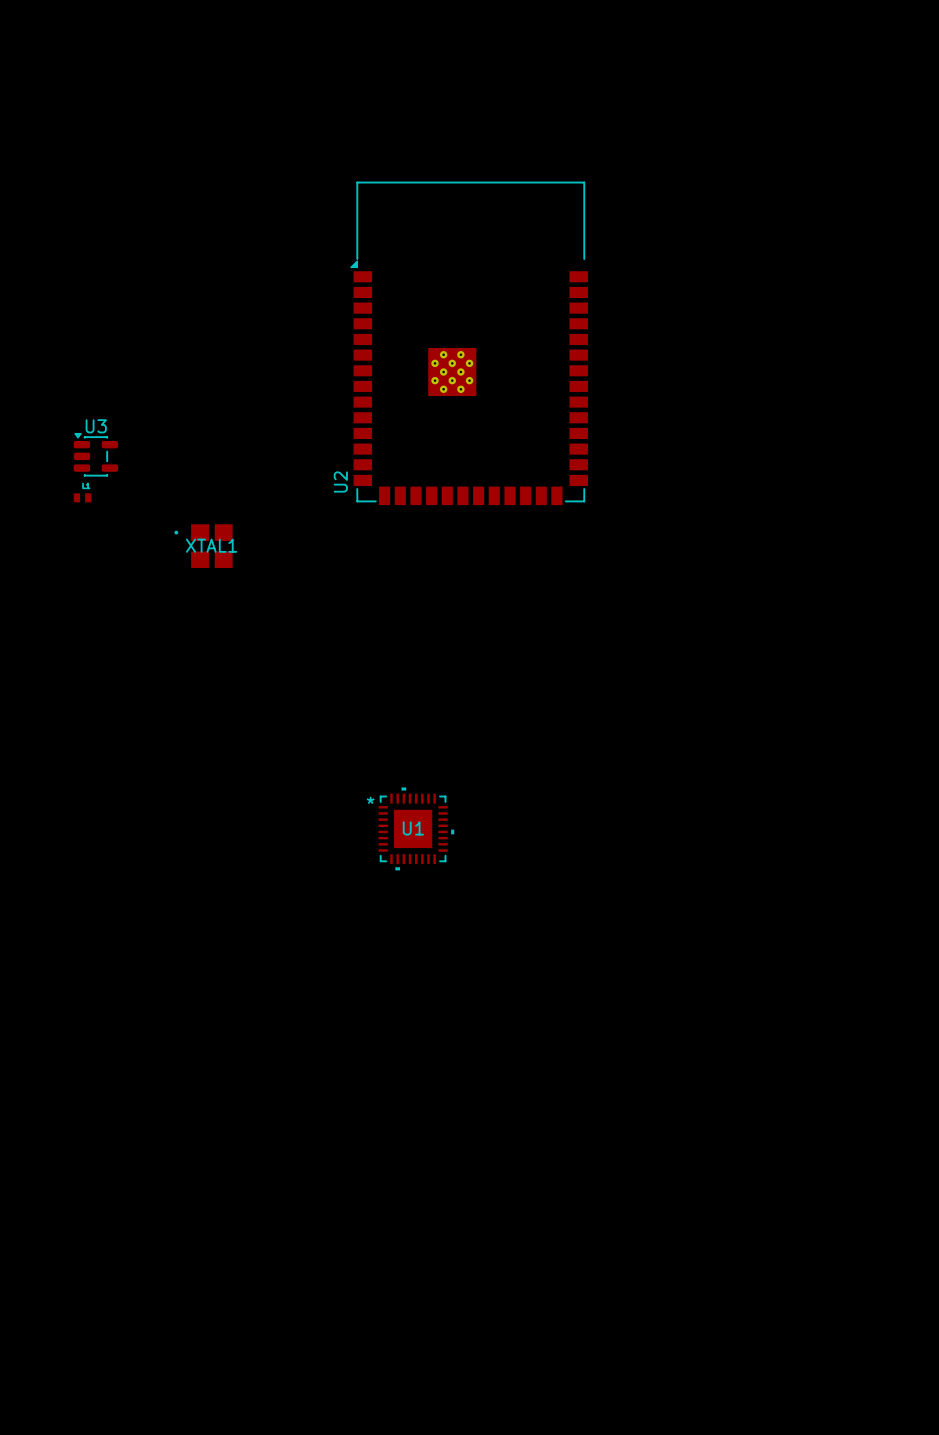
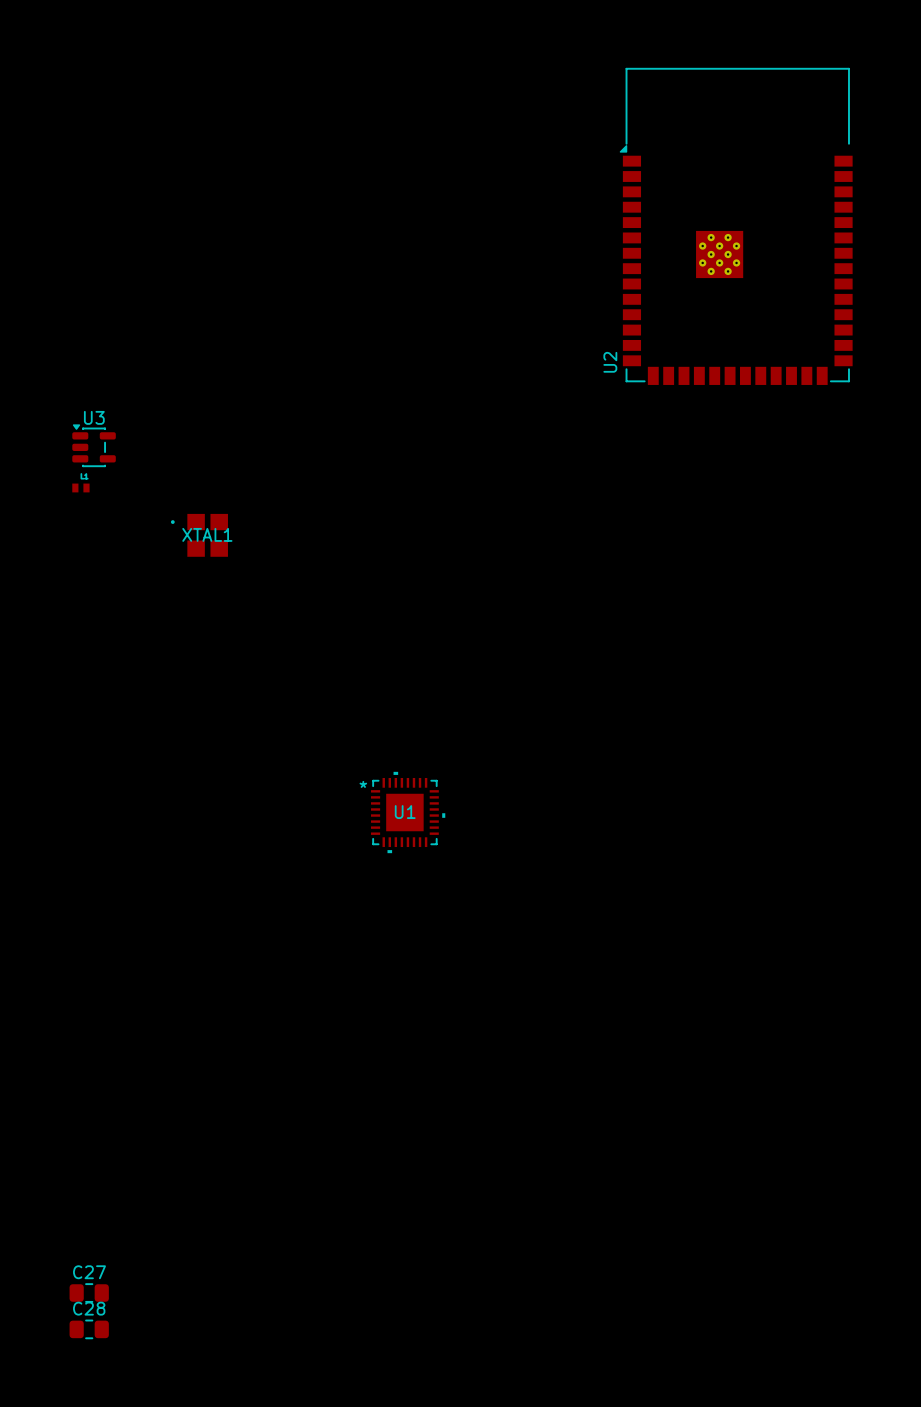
U2 position: (469, 343) -> (736, 226)
C27: none -> (89, 1293)
C28: none -> (89, 1329)

